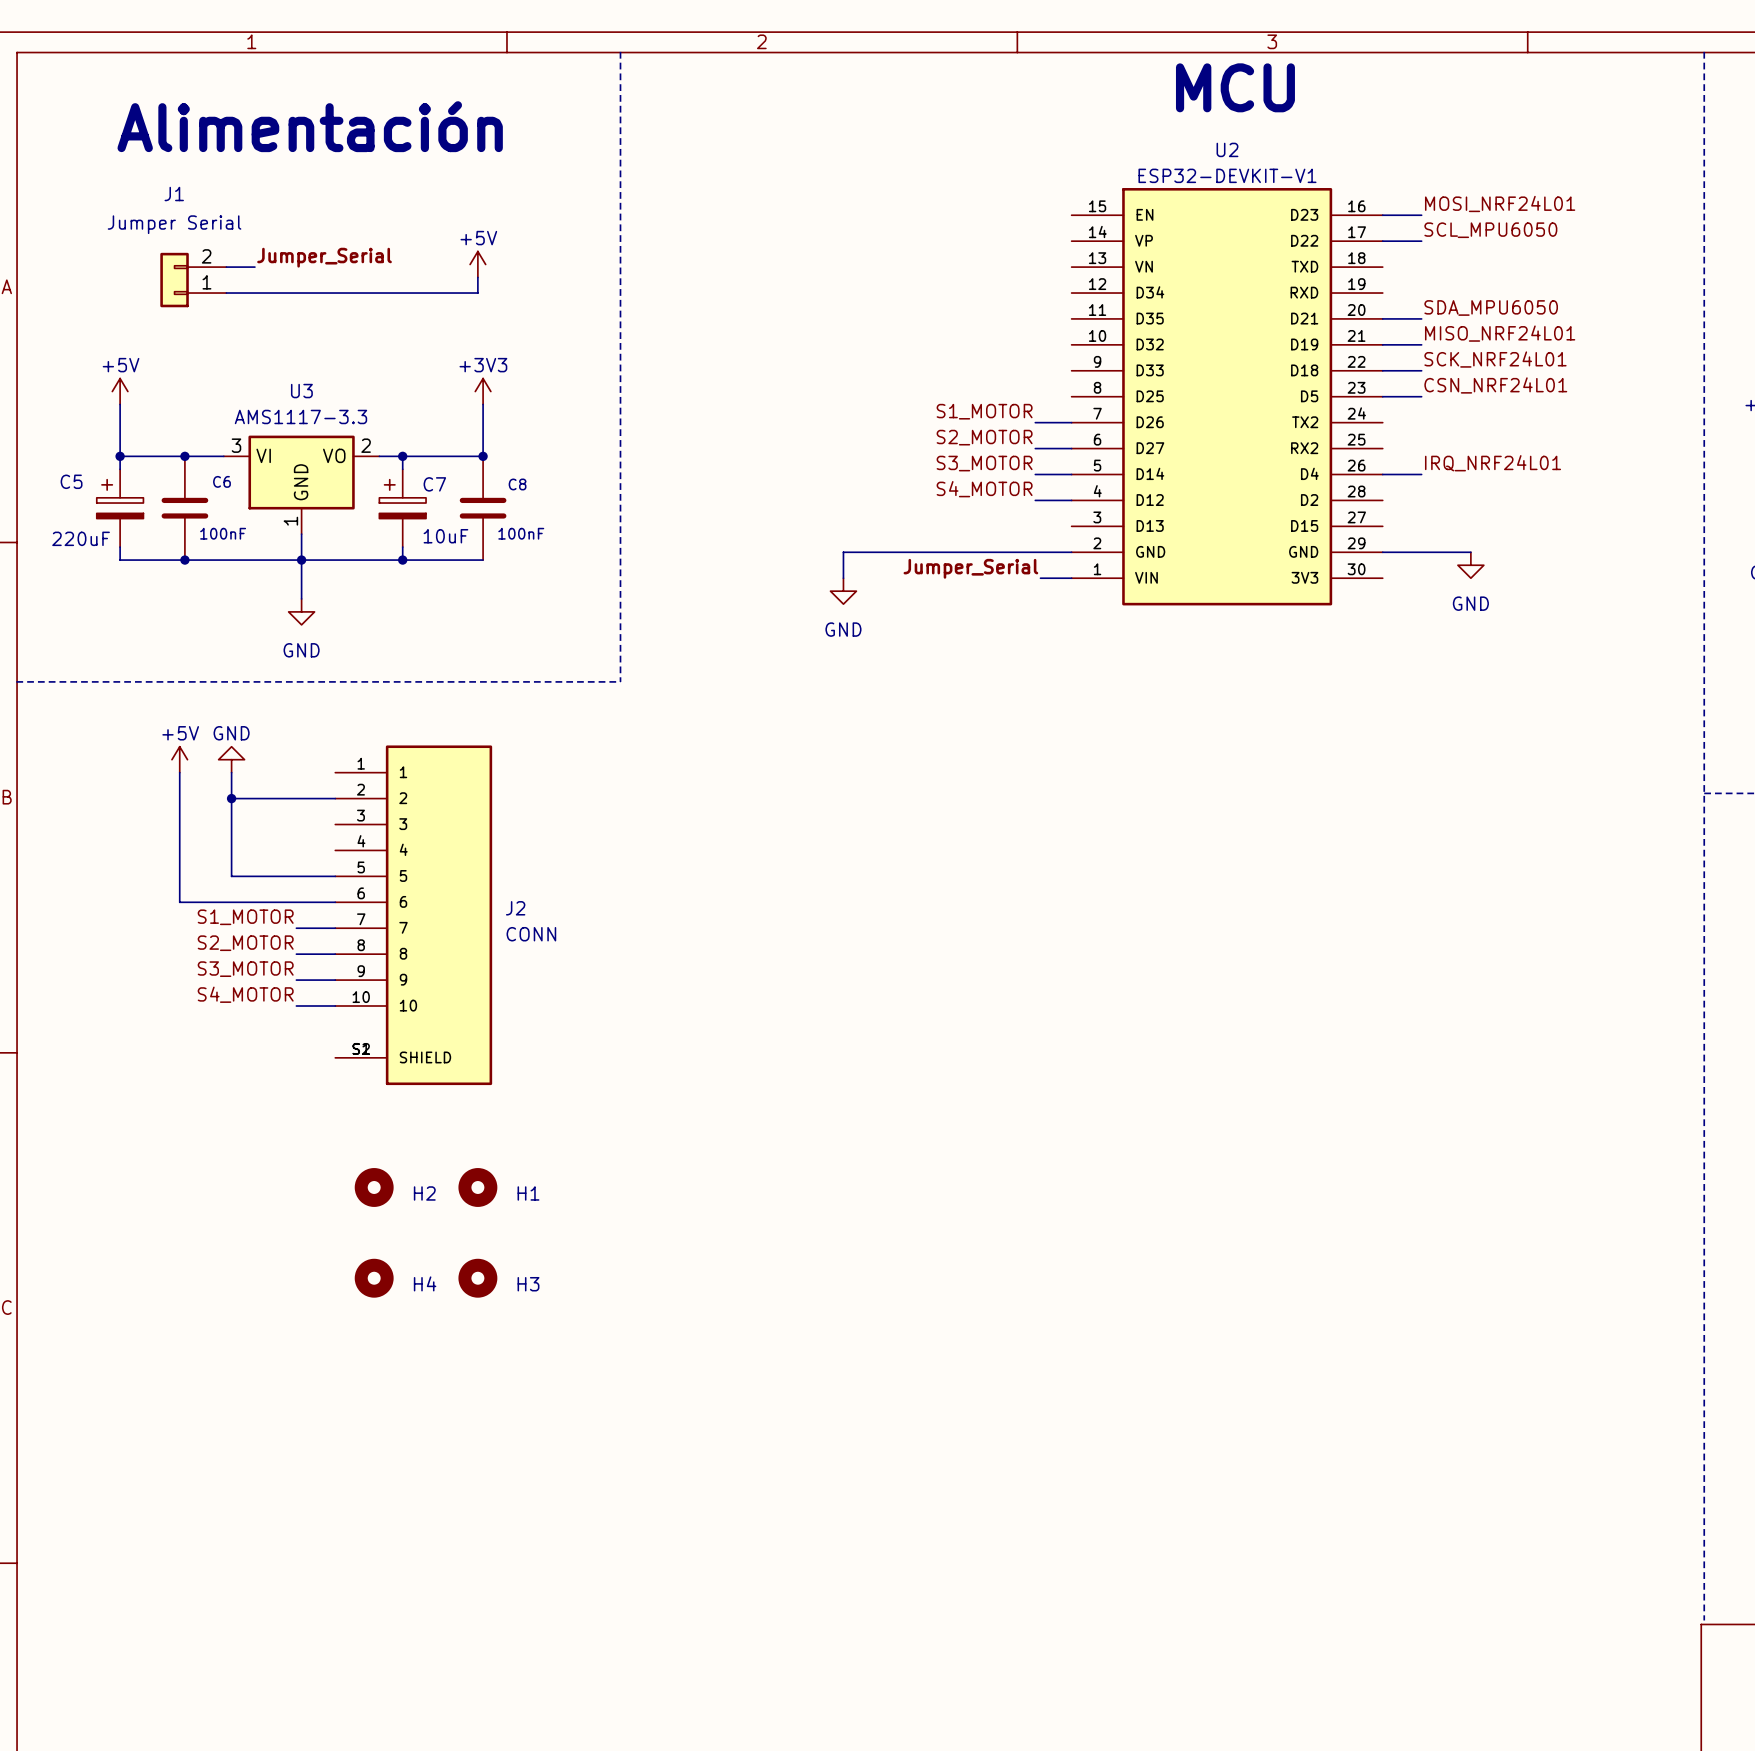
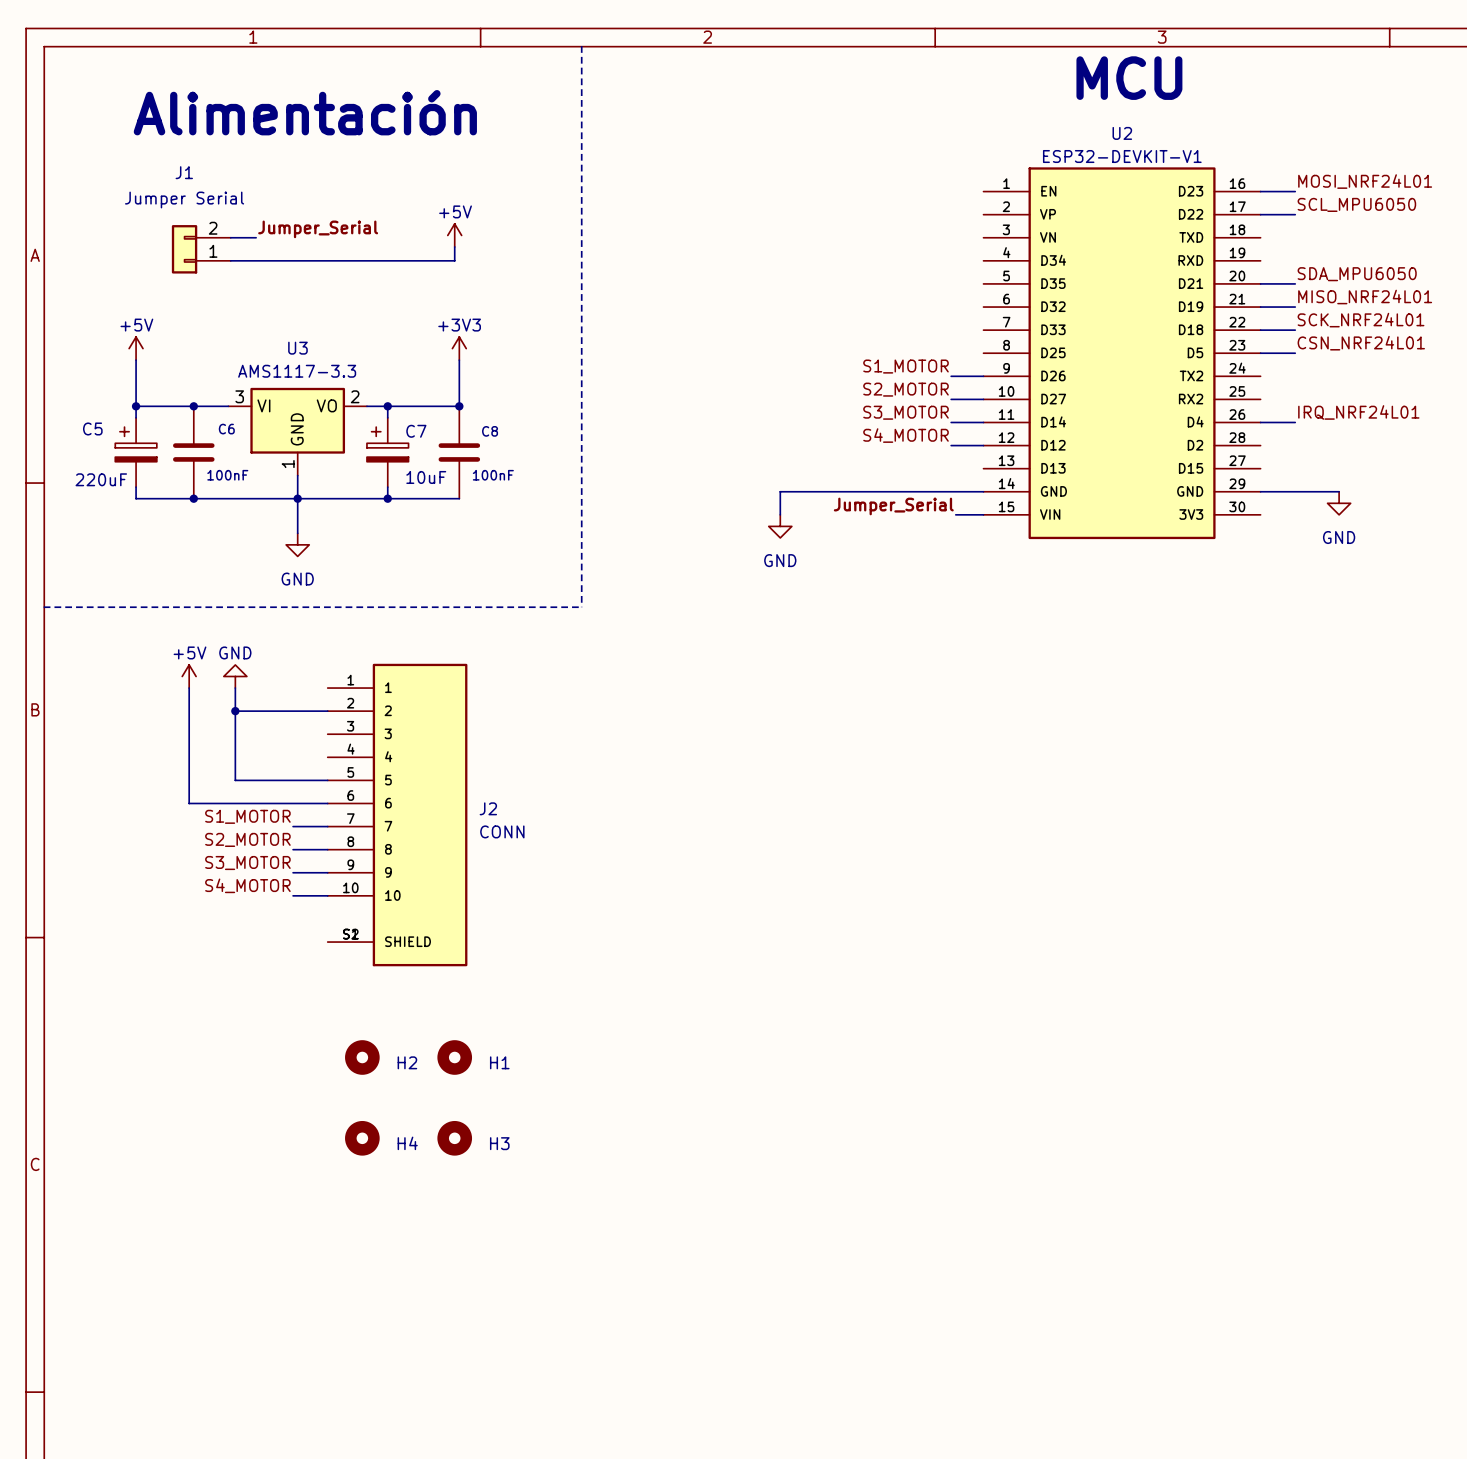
U2 symbol: [1071, 188, 1383, 606] -> [983, 167, 1261, 540]

